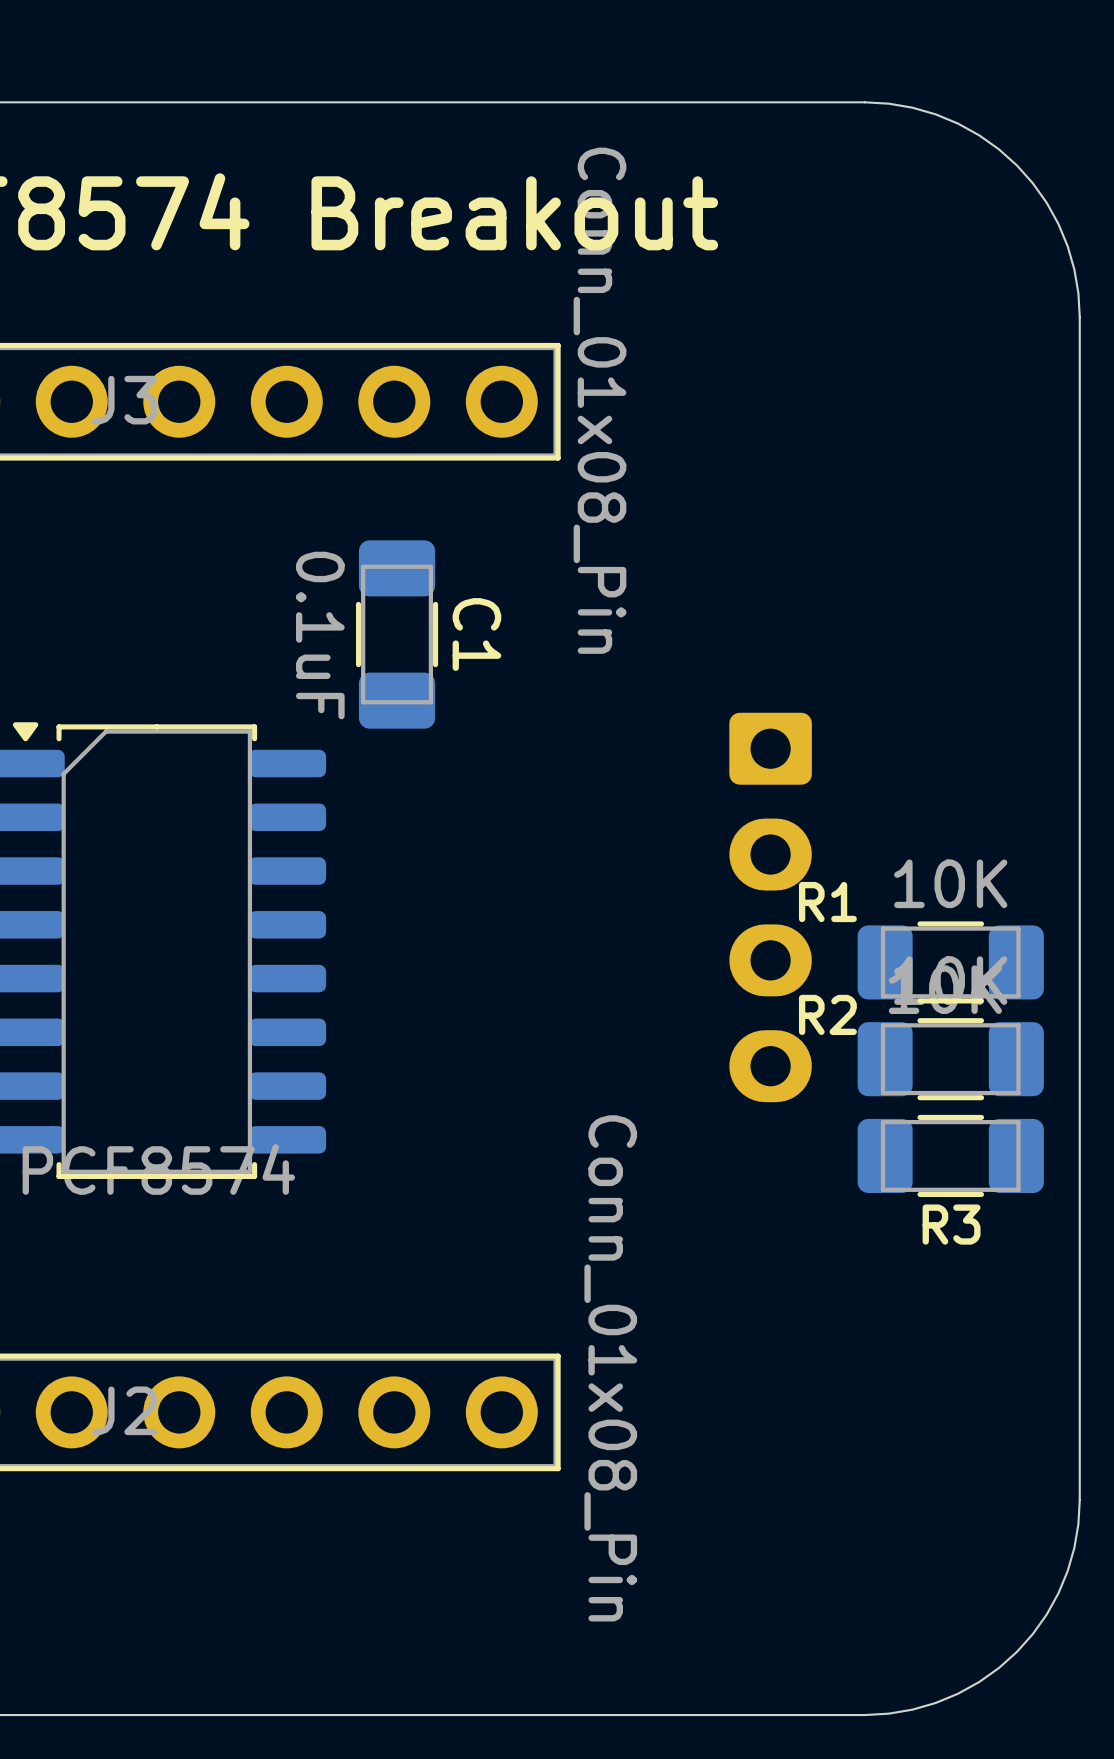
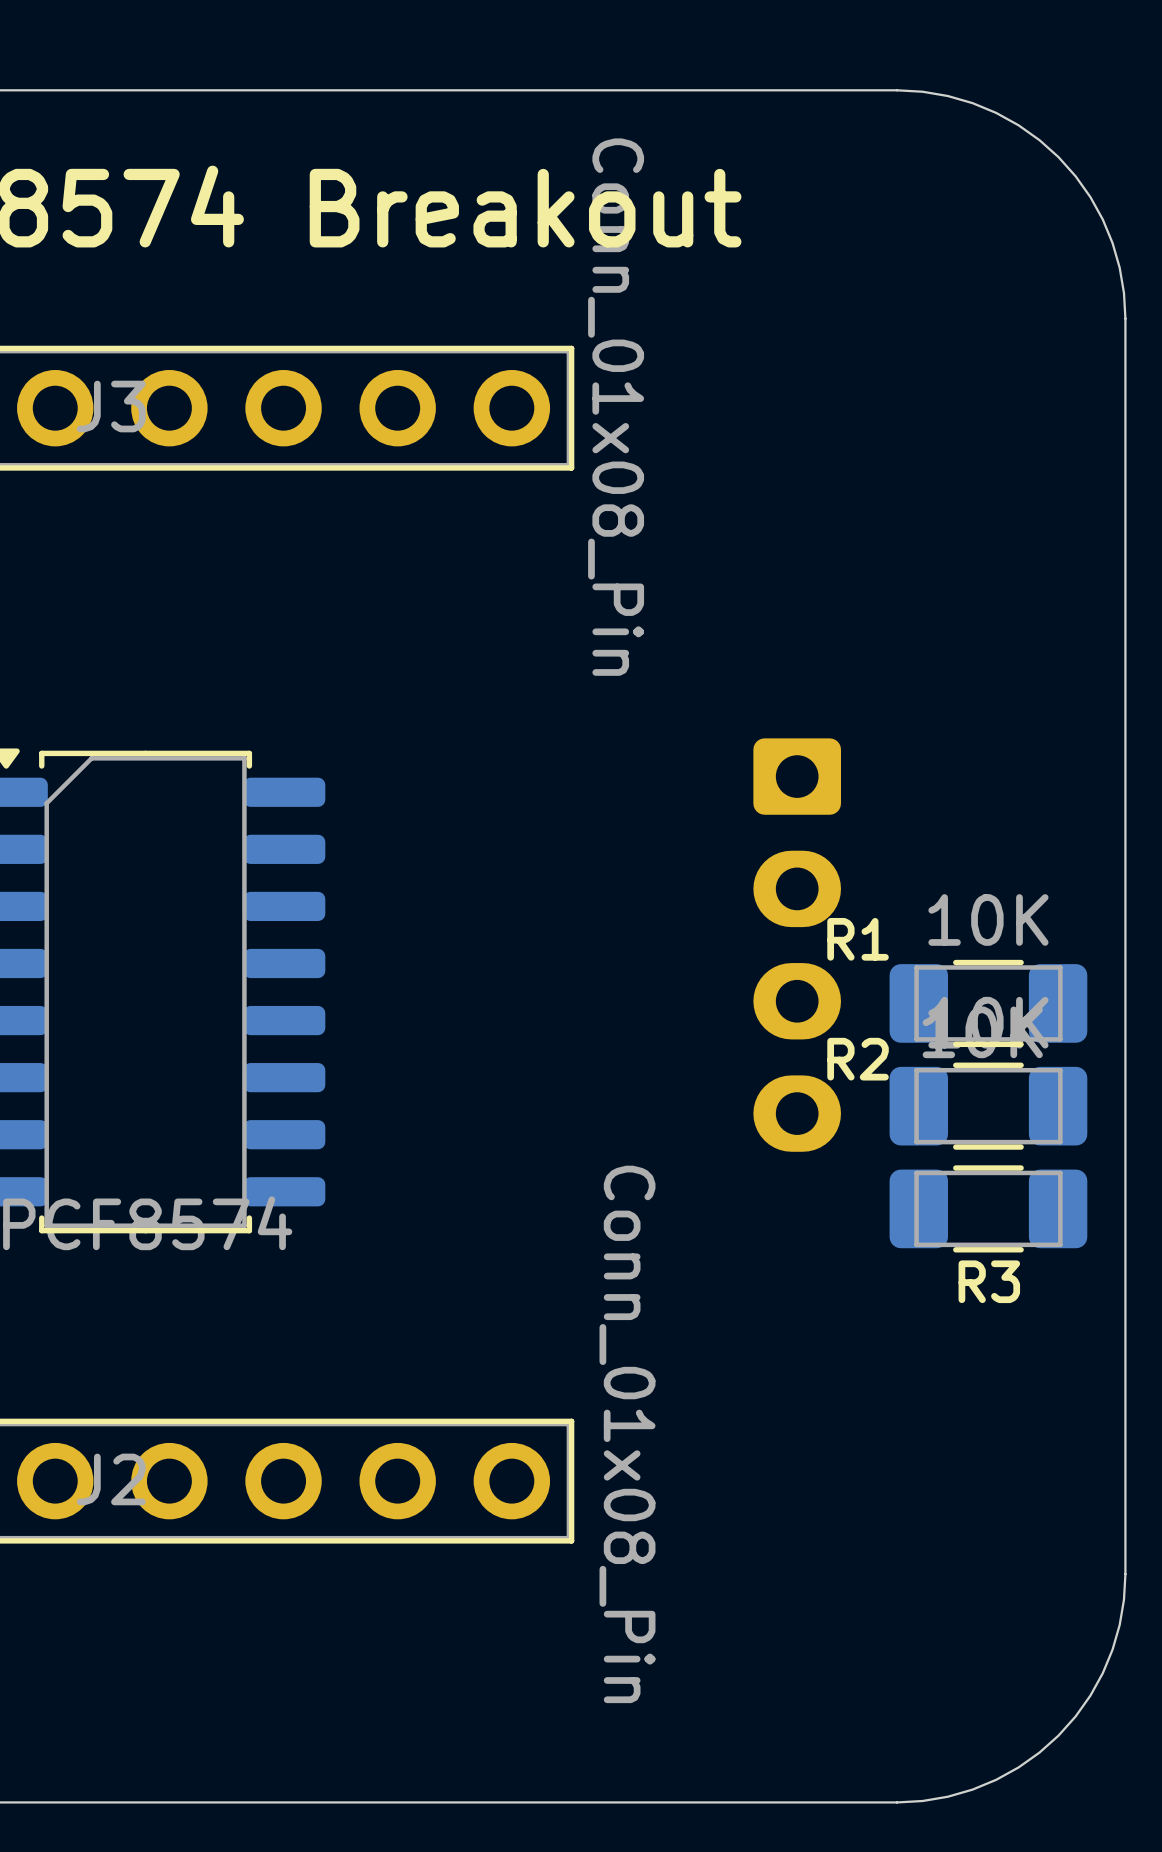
C1: 0.1uF (397, 634) -> none

